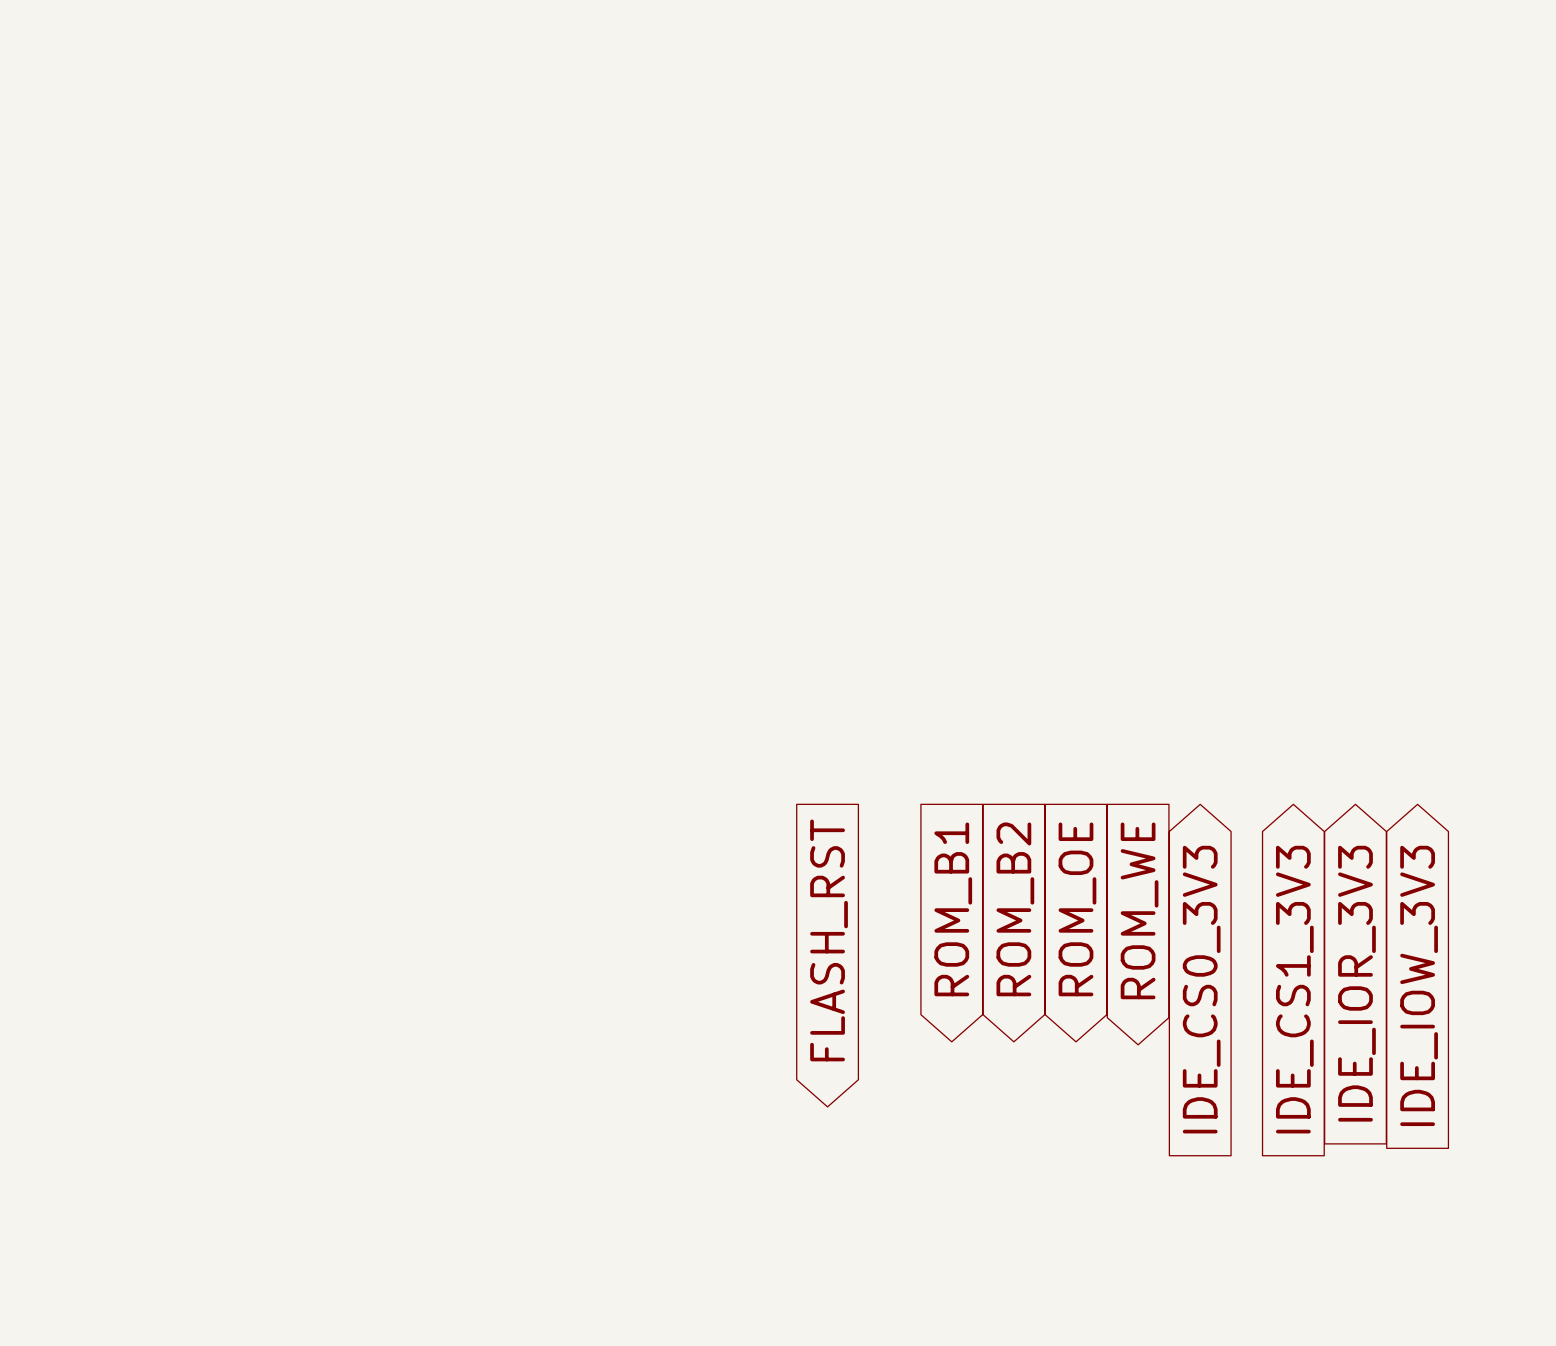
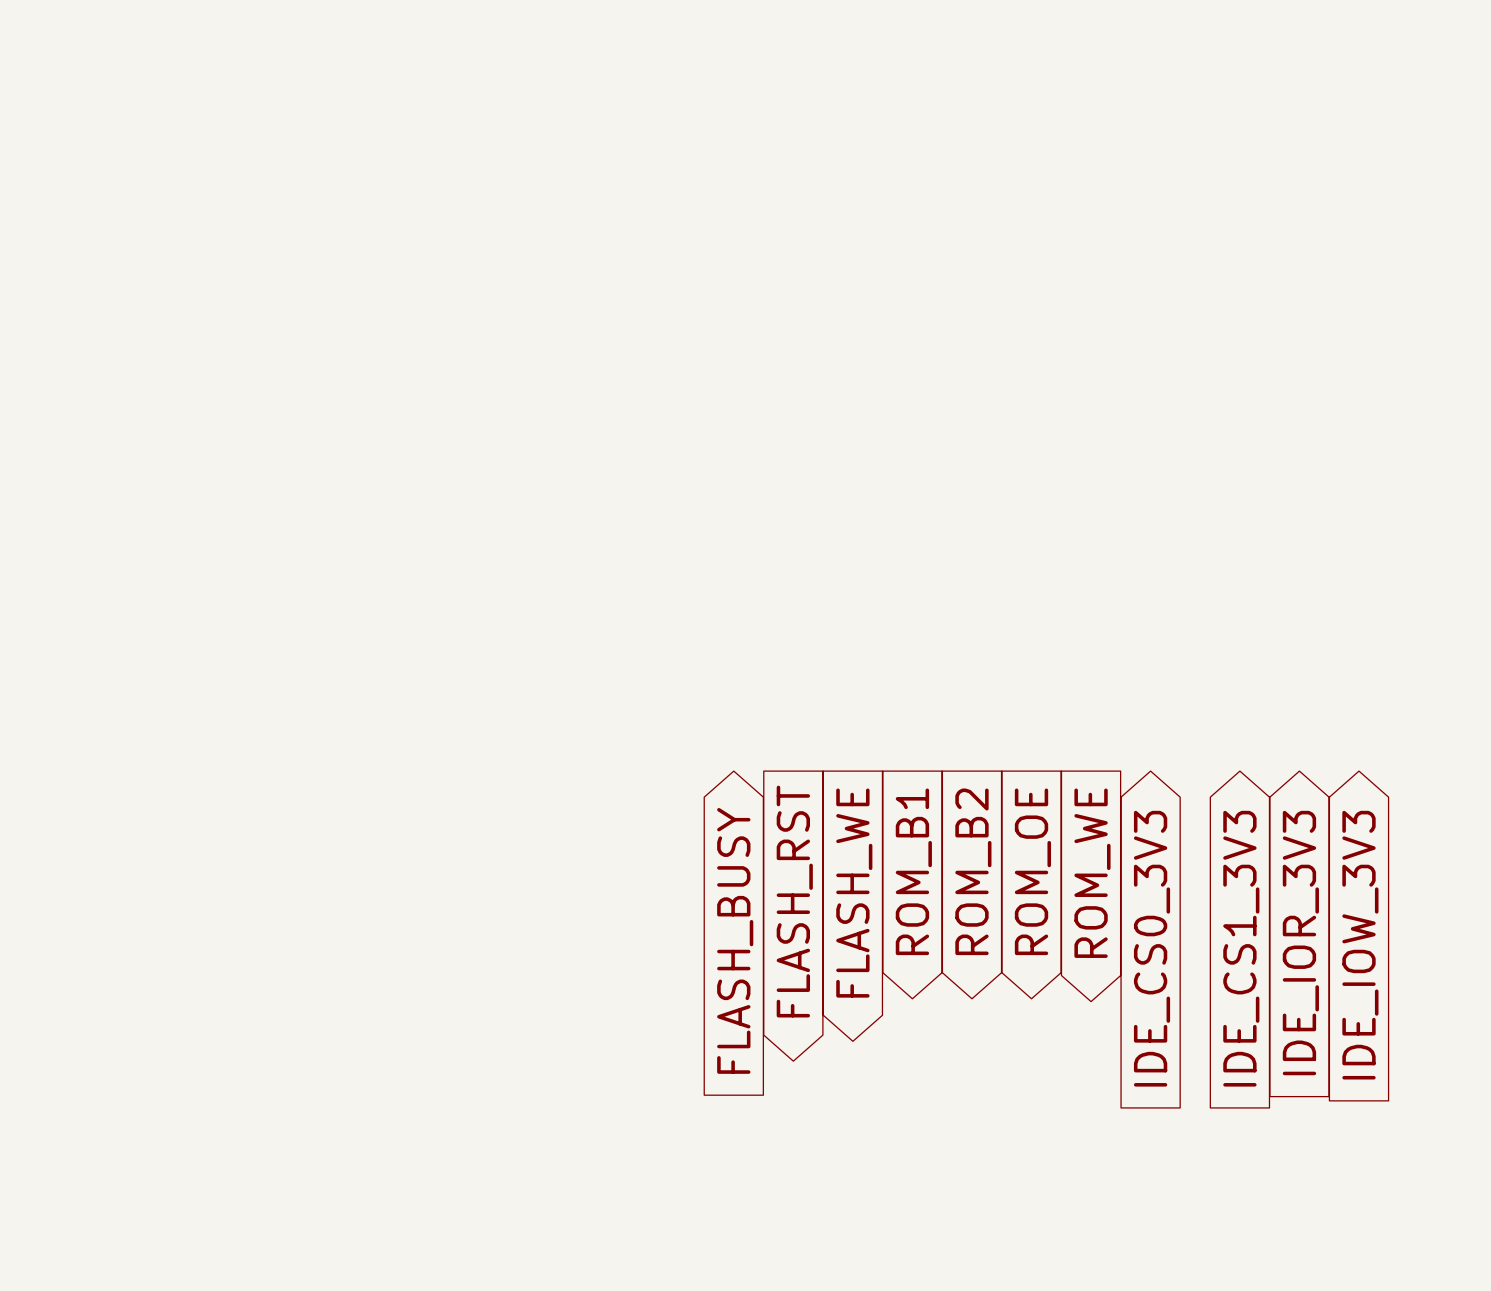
global label: none -> FLASH_WE (854, 893)
global label: none -> FLASH_BUSY (735, 940)

